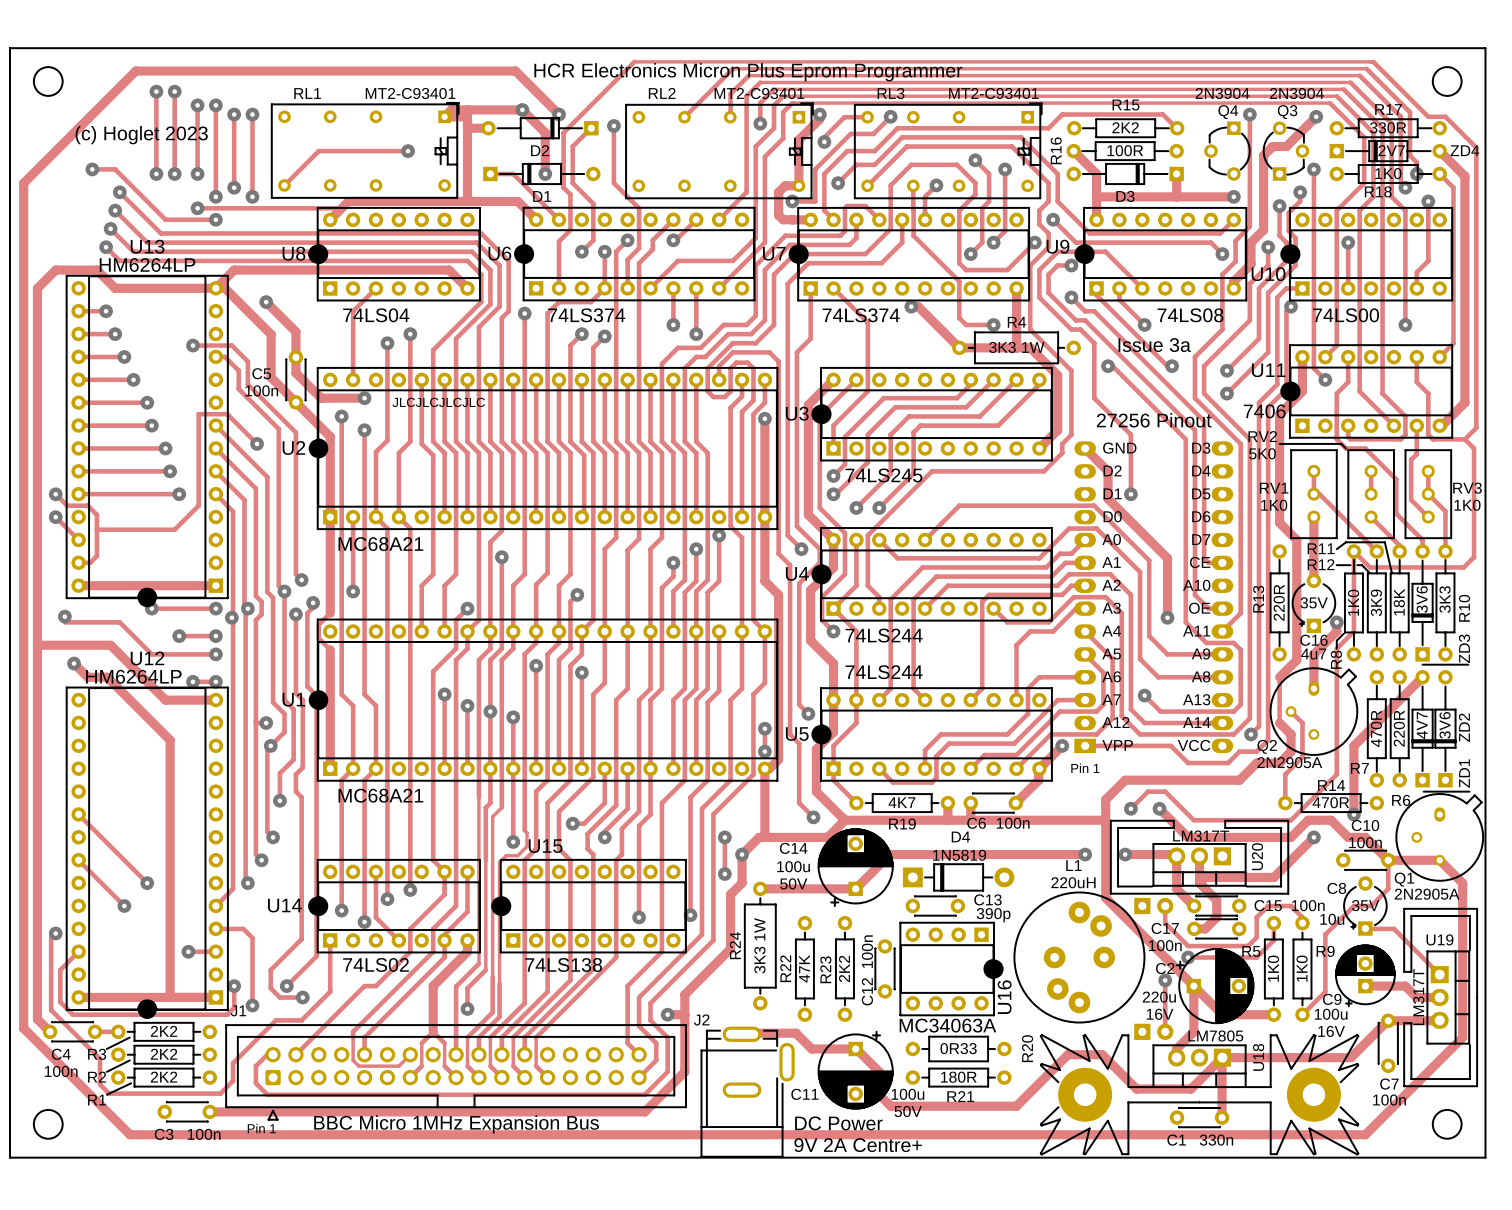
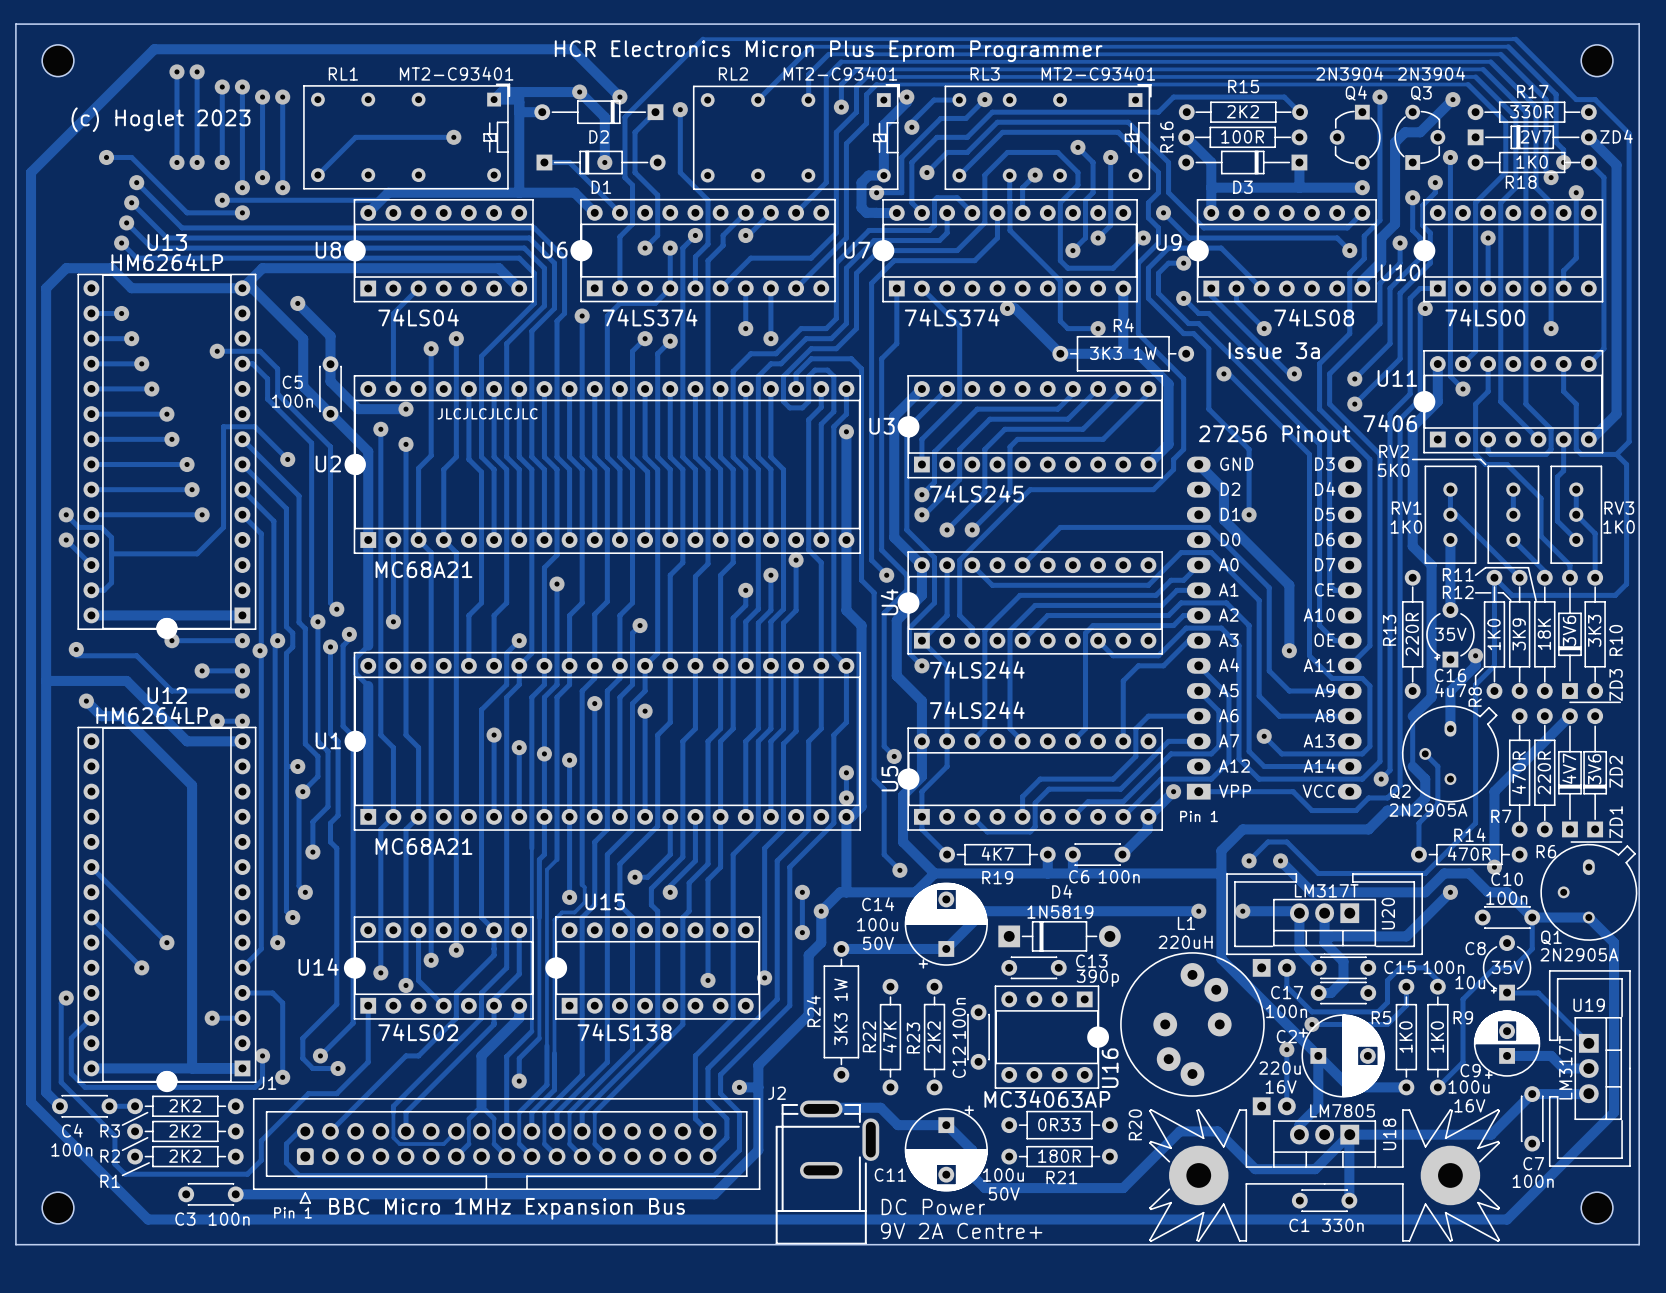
U4 name rotation: 0° (797, 573) -> 90° counterclockwise (889, 602)
U5 name rotation: 0° (797, 734) -> 90° counterclockwise (889, 778)
U16 value: MC34063A (947, 1025) -> MC34063AP (1047, 1099)

